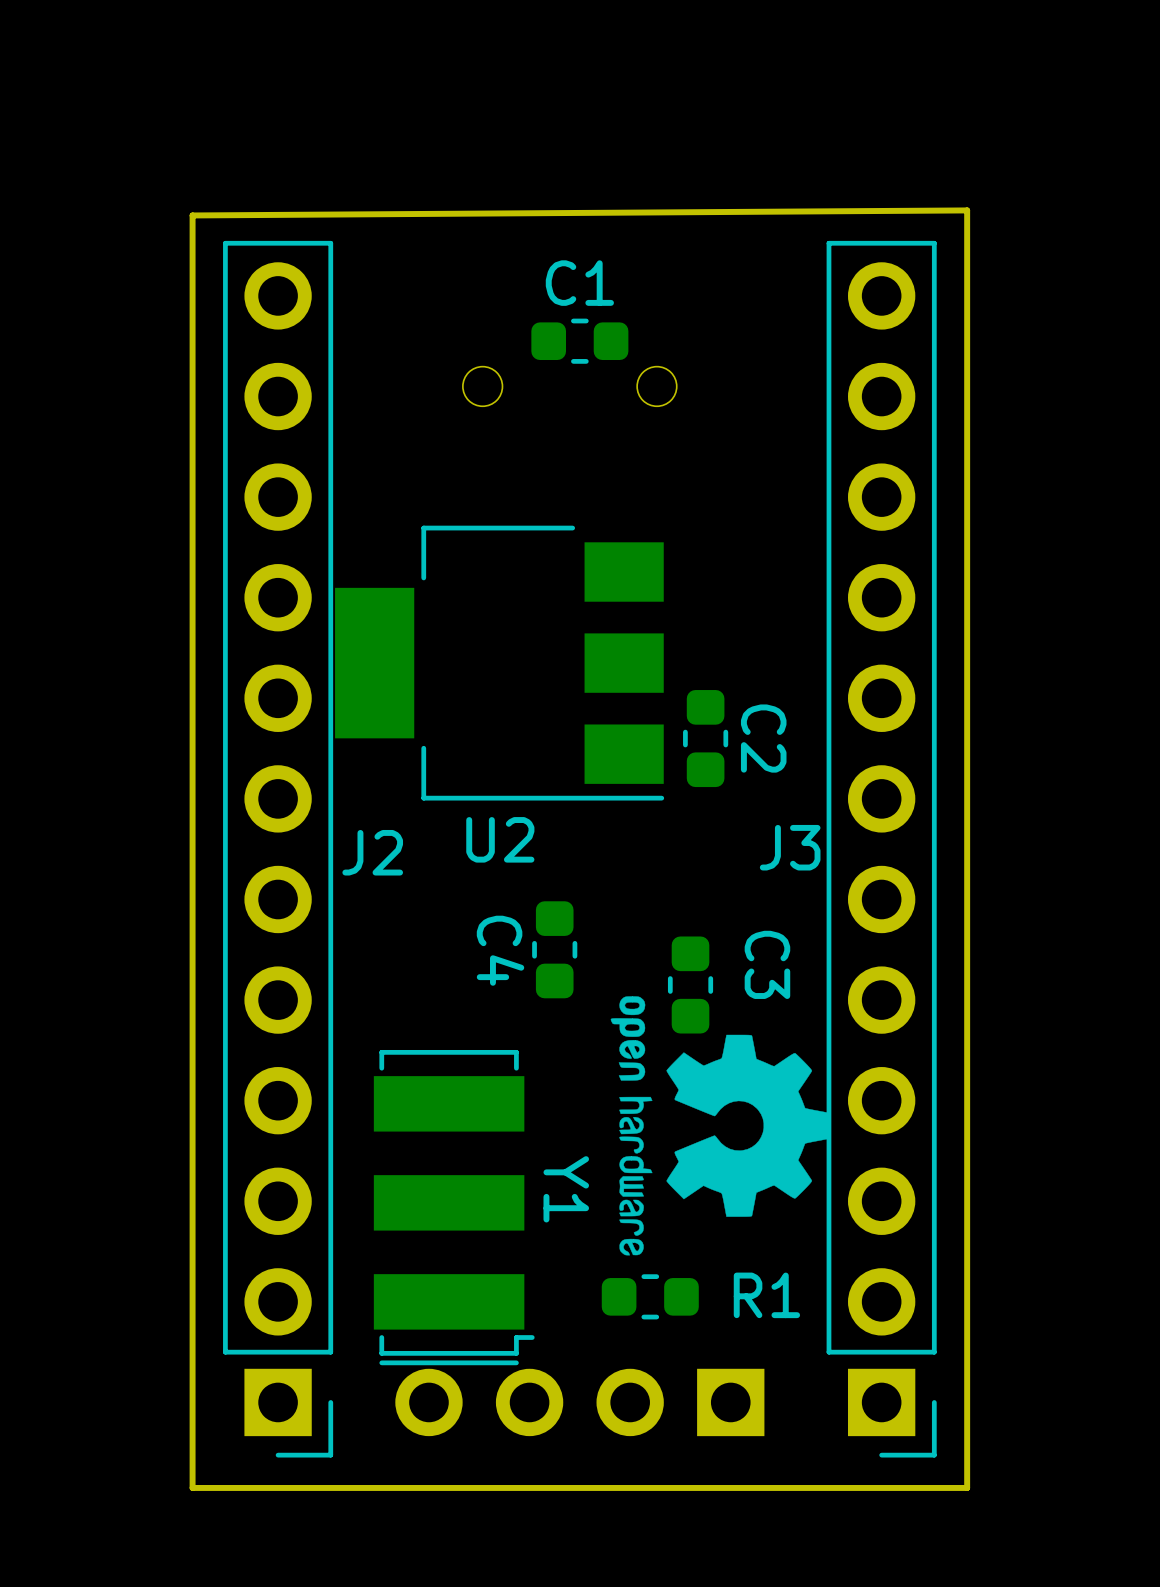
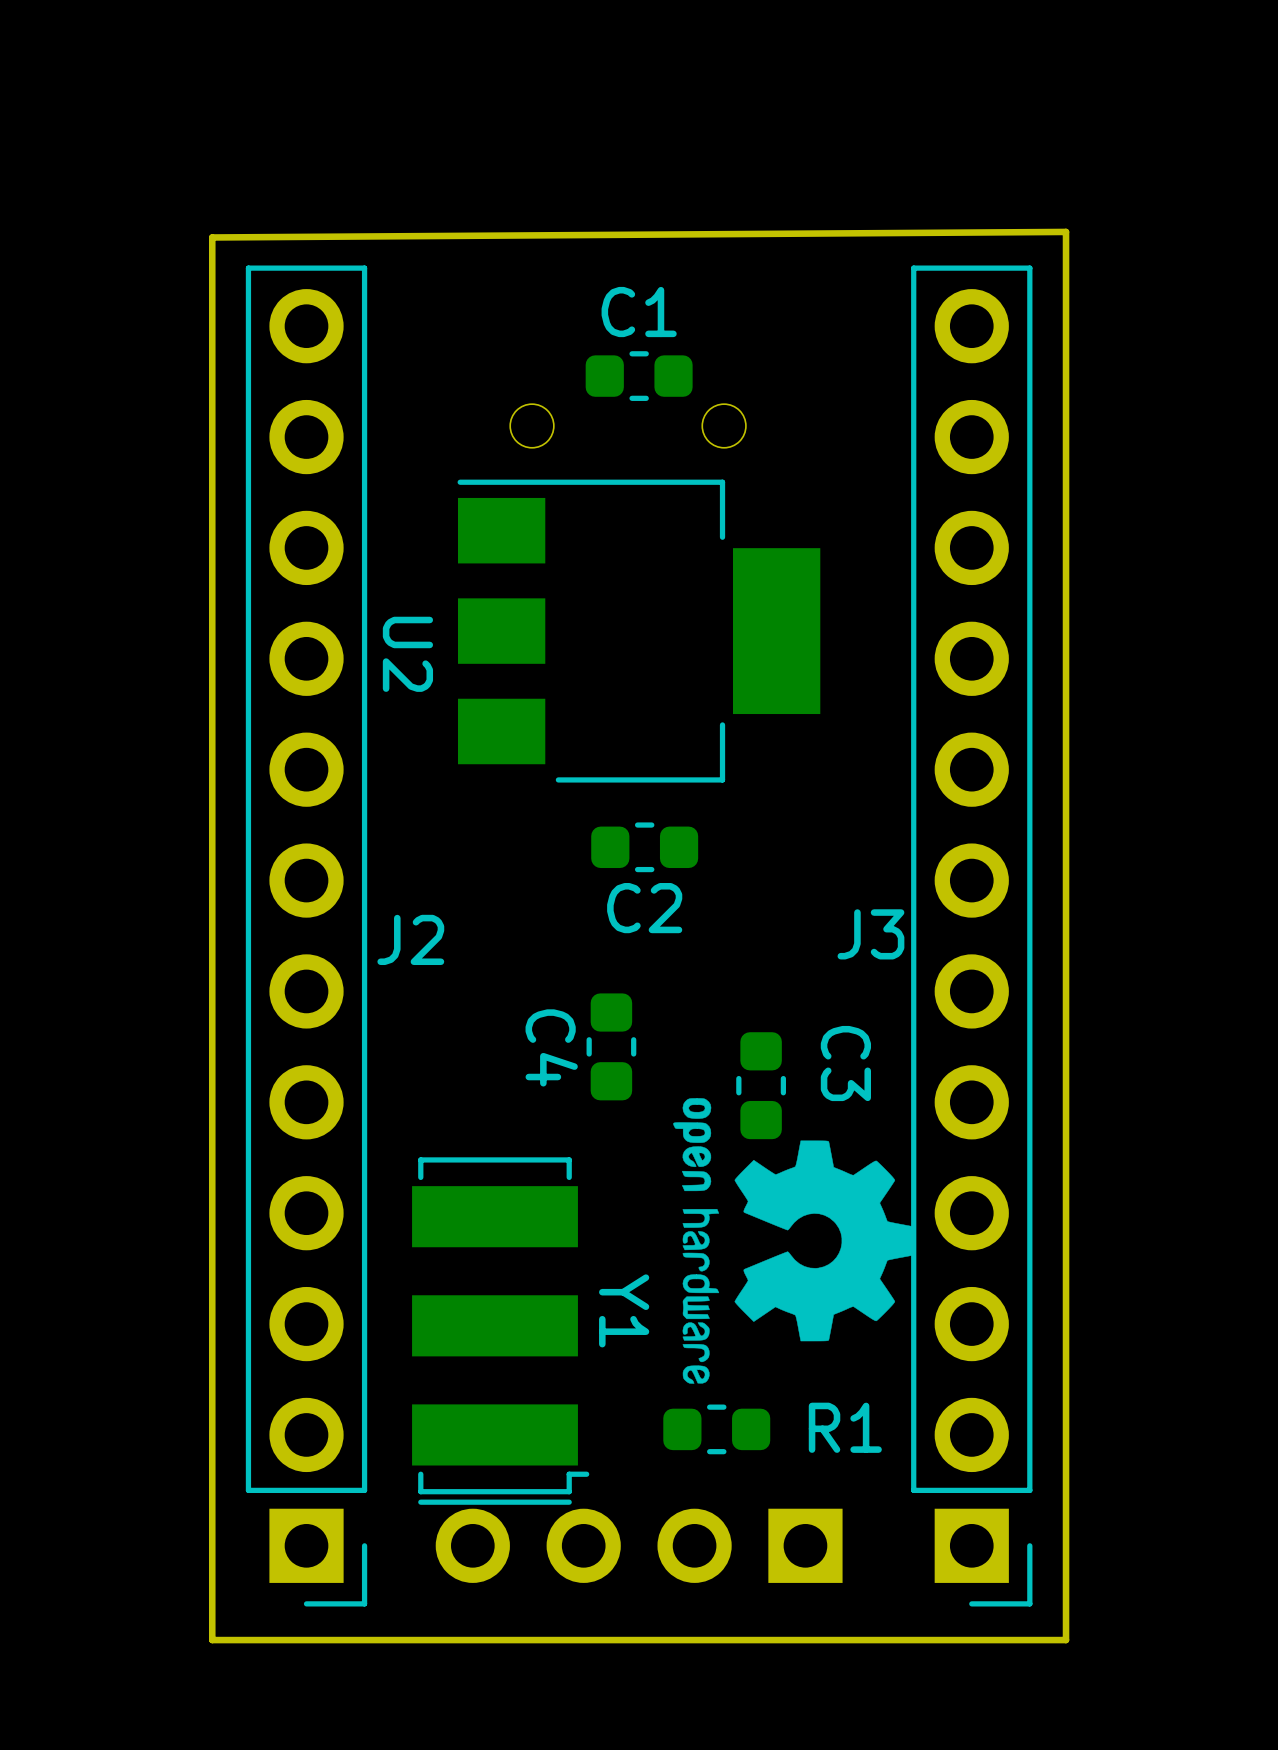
U2 rotation: 0° (499, 663) -> 180° (638, 631)
C2 rotation: 0° (705, 738) -> 90° clockwise (644, 847)
C2 position: (705, 738) -> (644, 847)
U2 name position: U2 (500, 839) -> U2 (407, 654)

